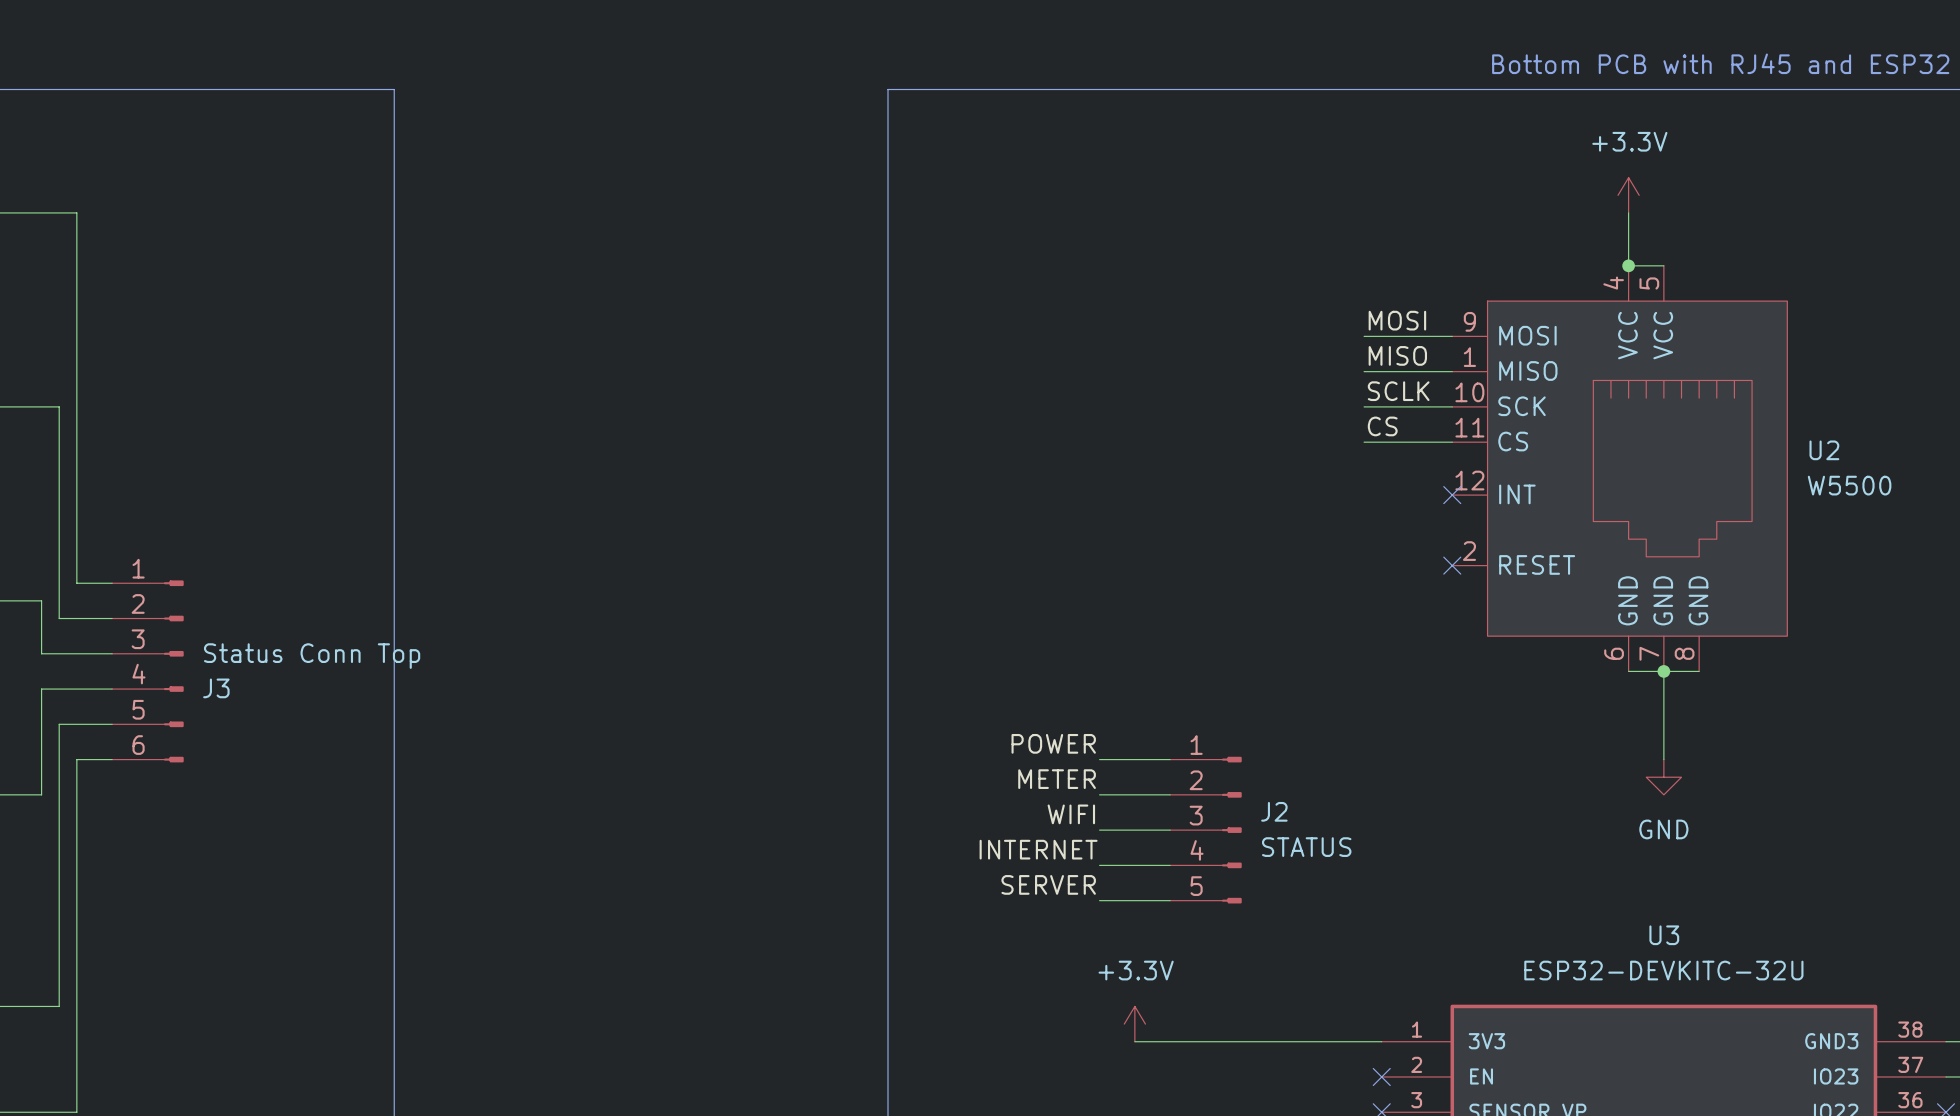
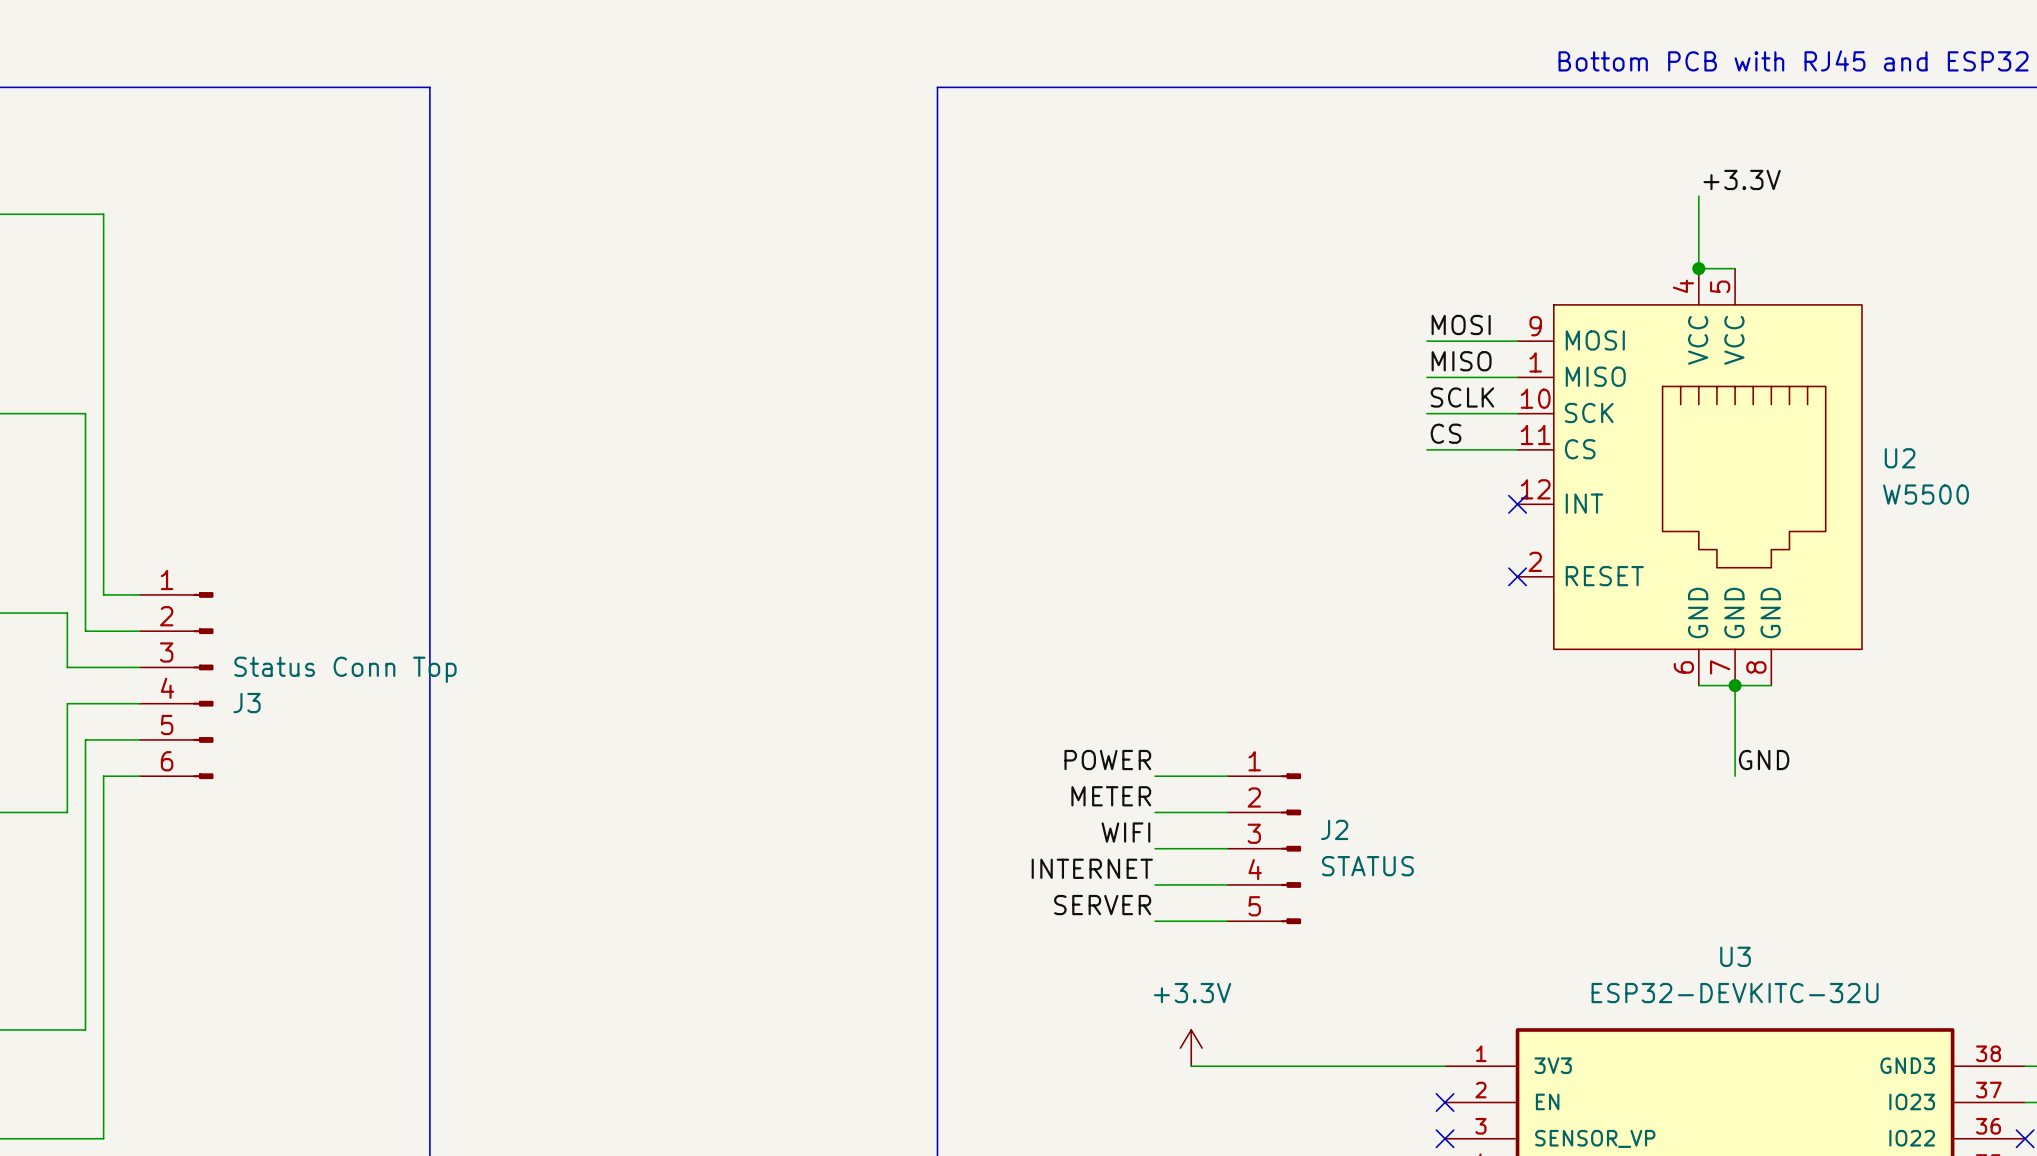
label: none -> +3.3V (1742, 179)
power symbol: +3.3V (1628, 195) -> none
label: none -> GND (1764, 760)
power symbol: GND (1663, 777) -> none

